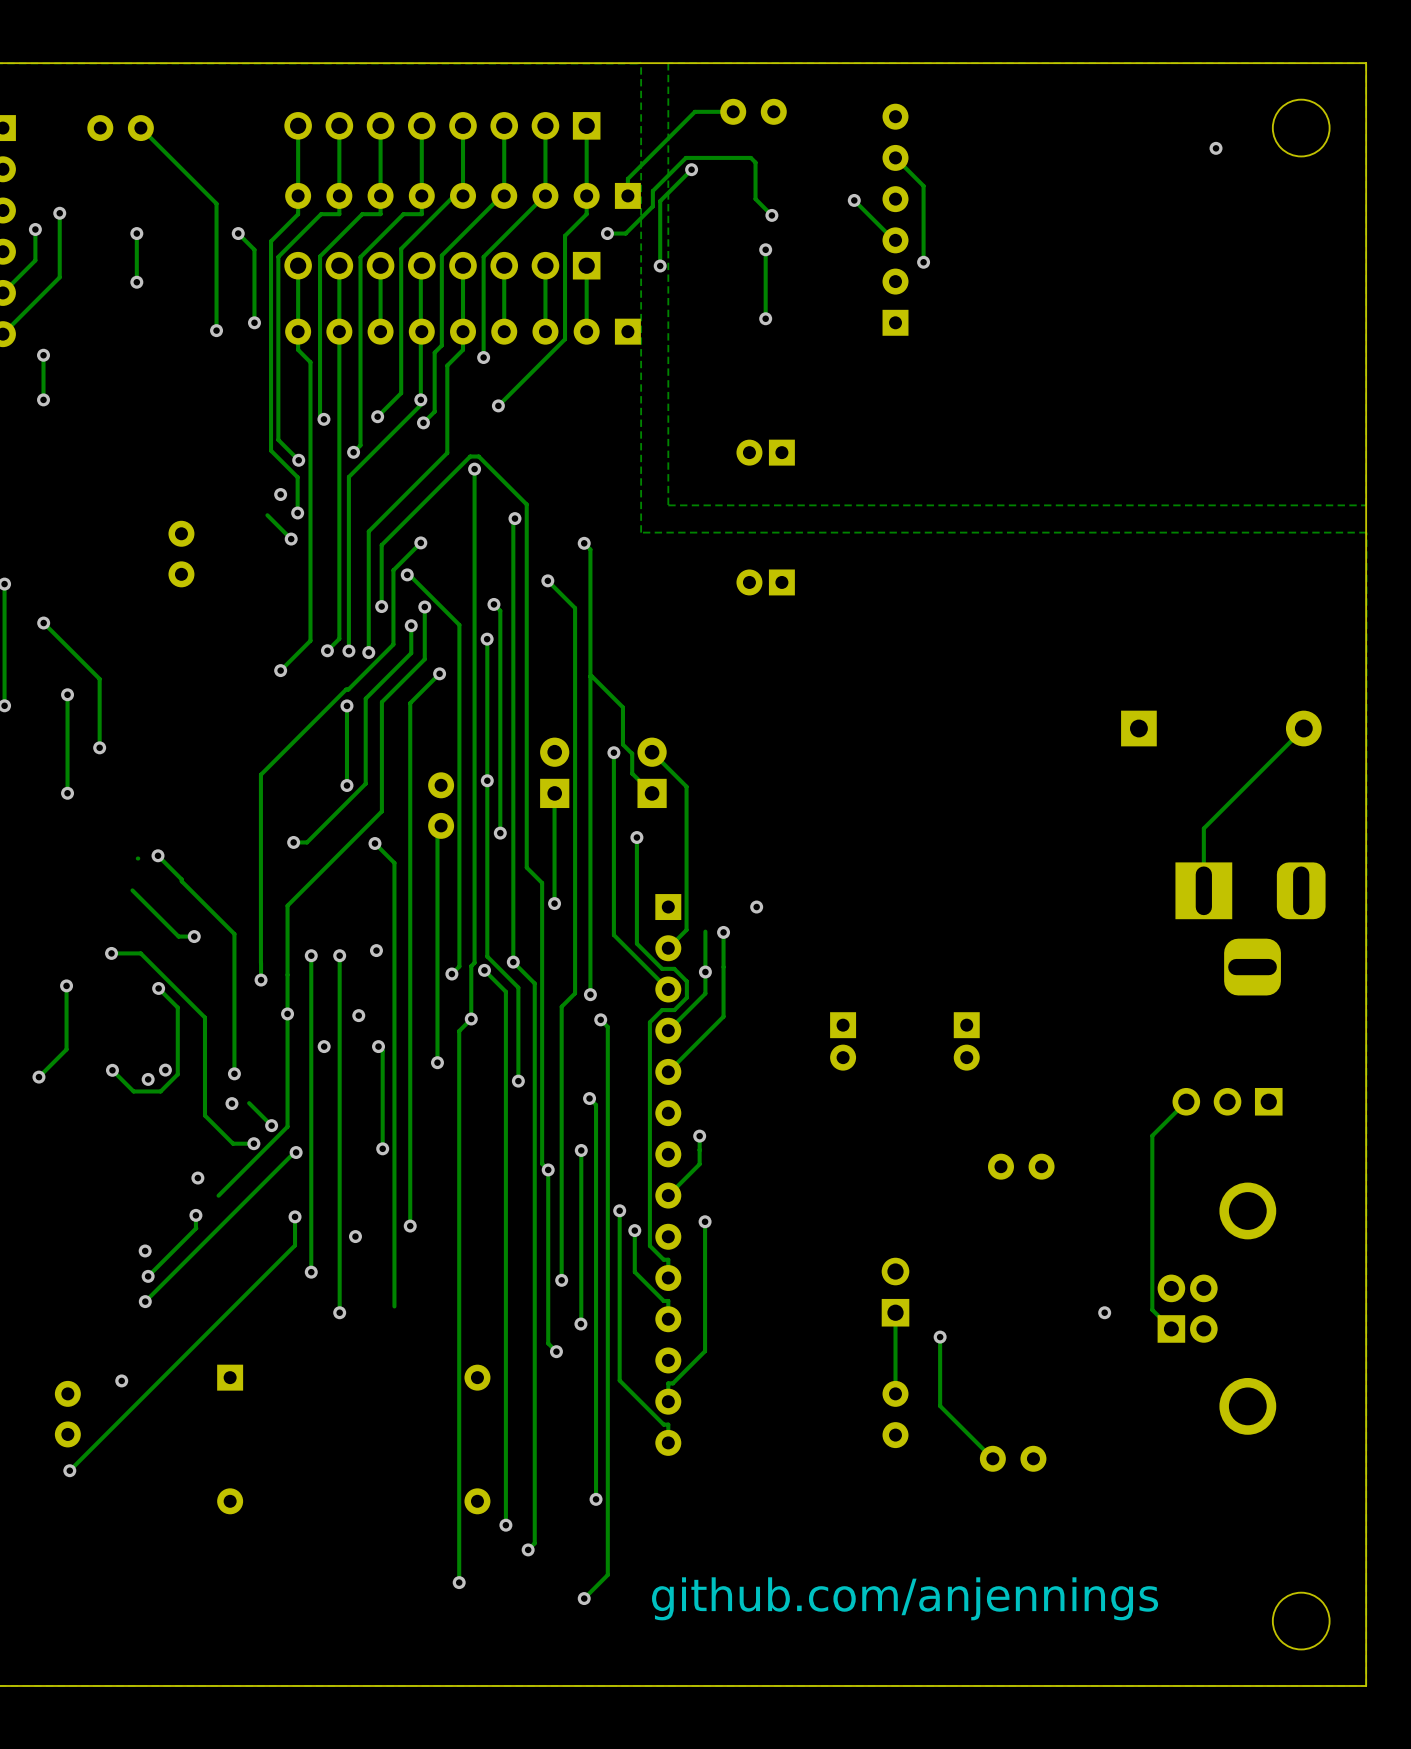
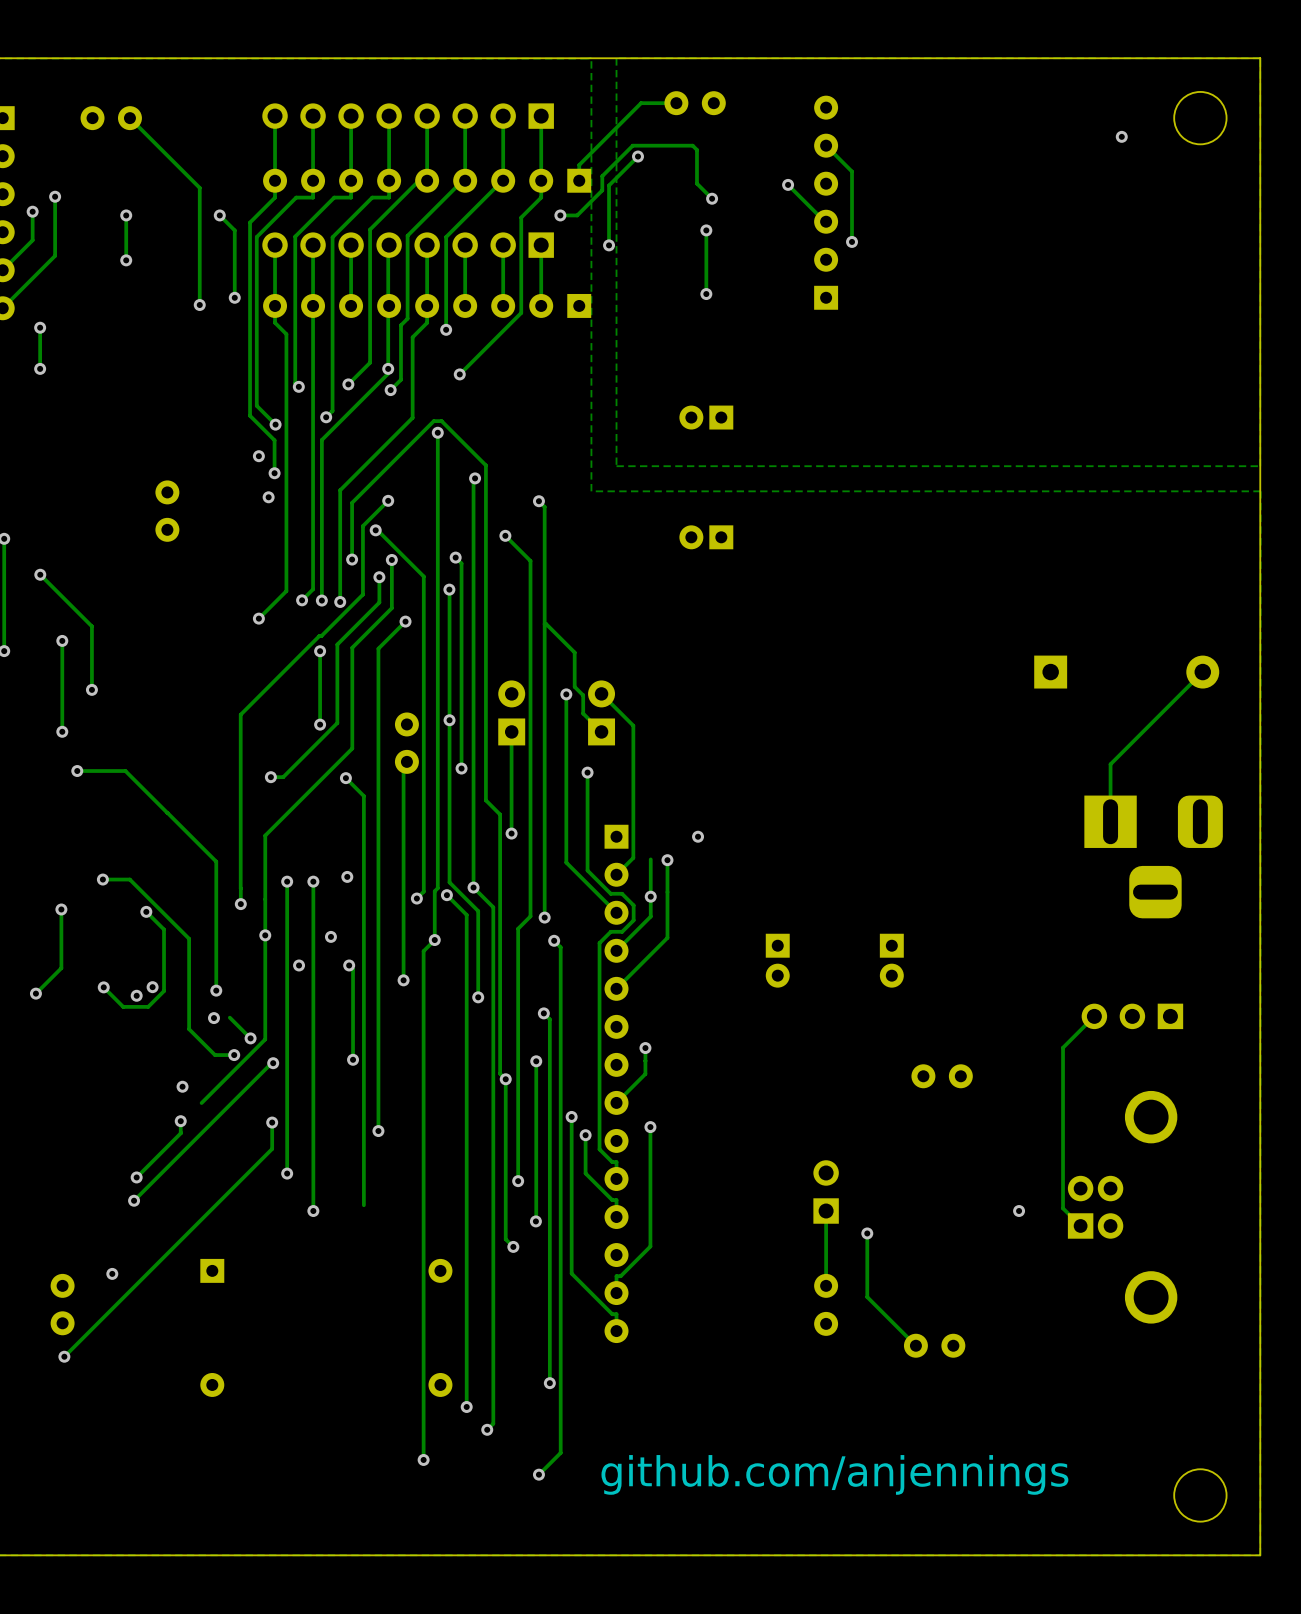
track: (267, 515) (291, 539) -> none
via: none -> (77, 771)
track: (158, 855) (181, 881) -> (77, 771) (125, 771) (167, 813)
via: (158, 855) -> none
track: (138, 858) (137, 858) -> none
track: (132, 890) (178, 936) (194, 936) -> none
via: (194, 936) -> none
via: (355, 1236) -> none
via: (145, 1250) -> none

